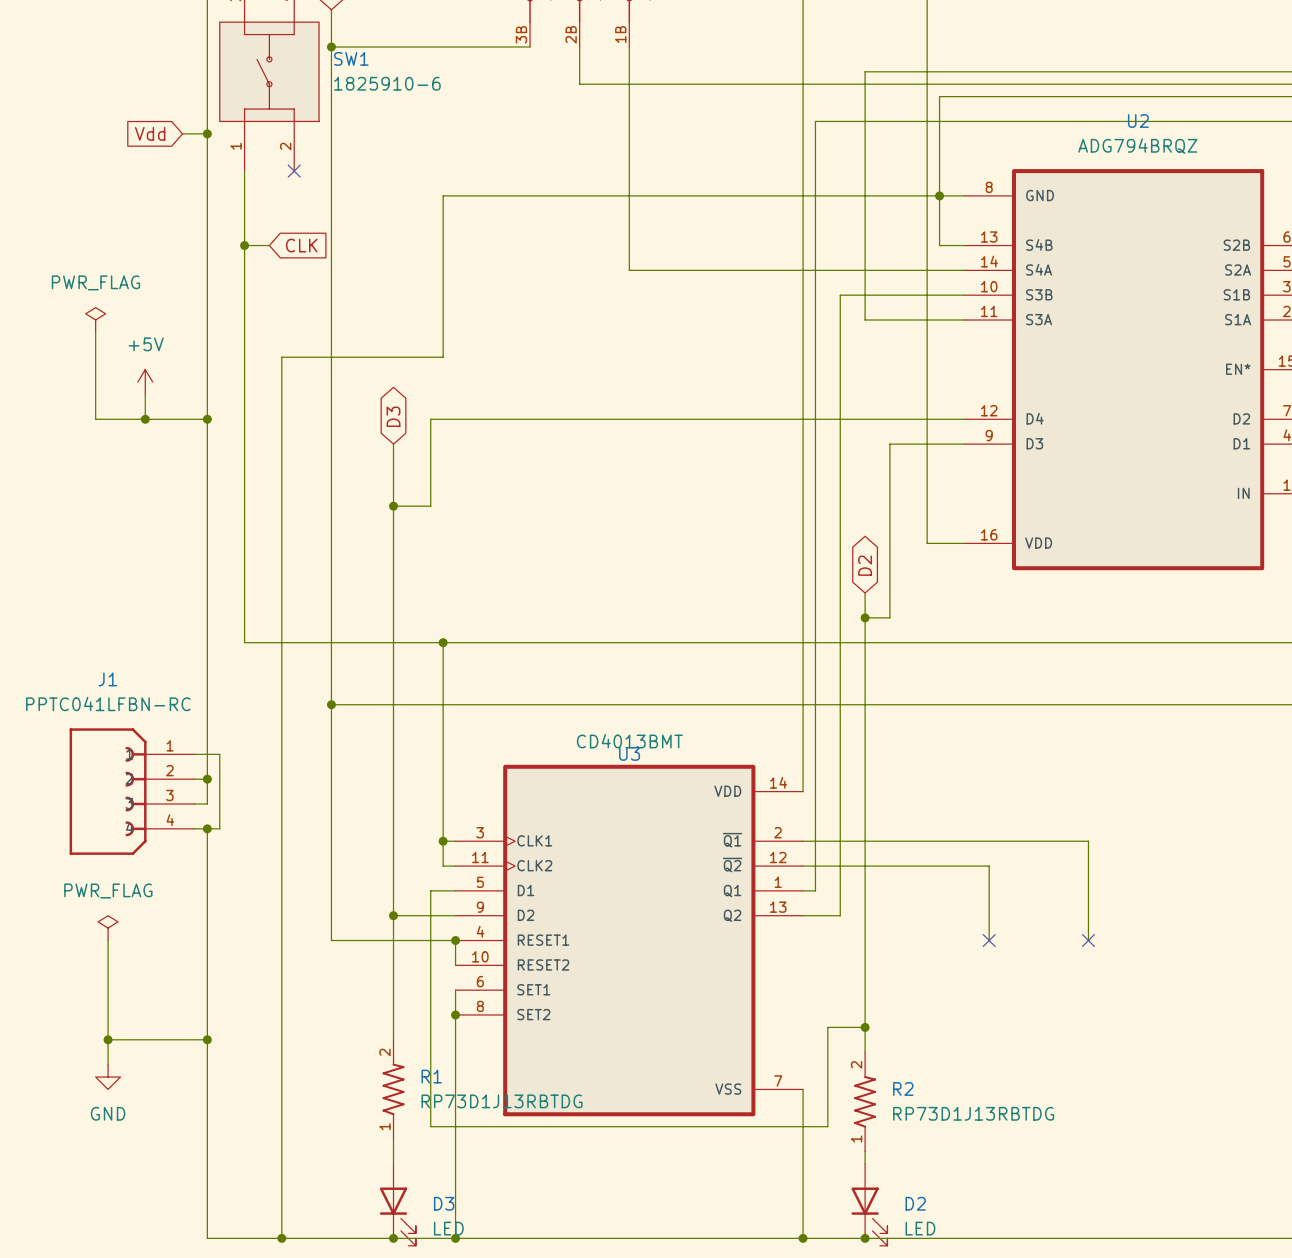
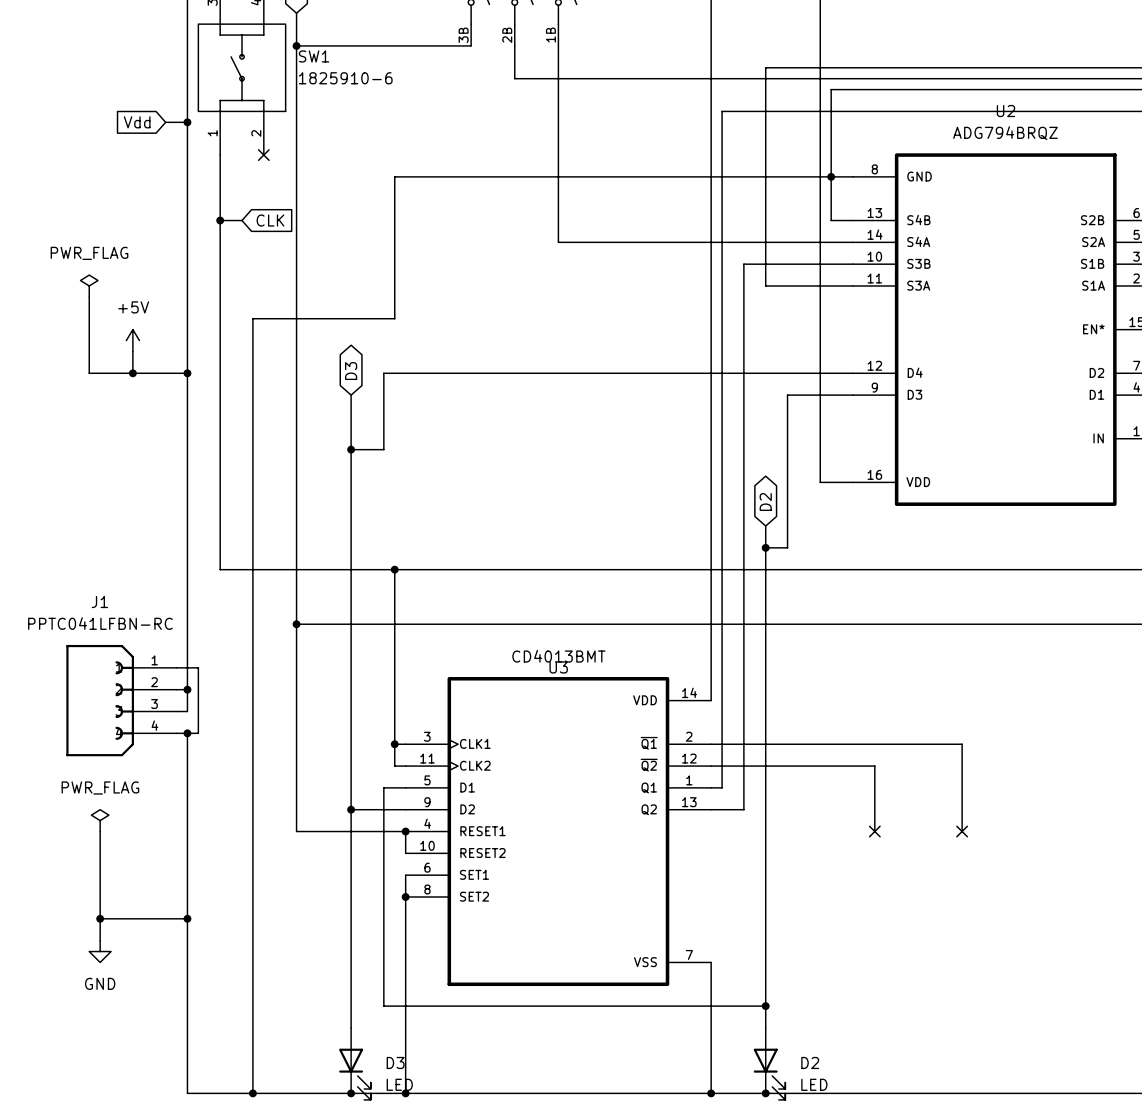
wire: (865, 1027) (827, 1027) (827, 1126) (430, 1126) -> (765, 1006) (383, 1006) (383, 995)
junction: (865, 1027) -> none
R1: RP73D1J13RBTDG (393, 1089) -> none
R2: RP73D1J13RBTDG (865, 1101) -> none
junction: none -> (765, 1006)

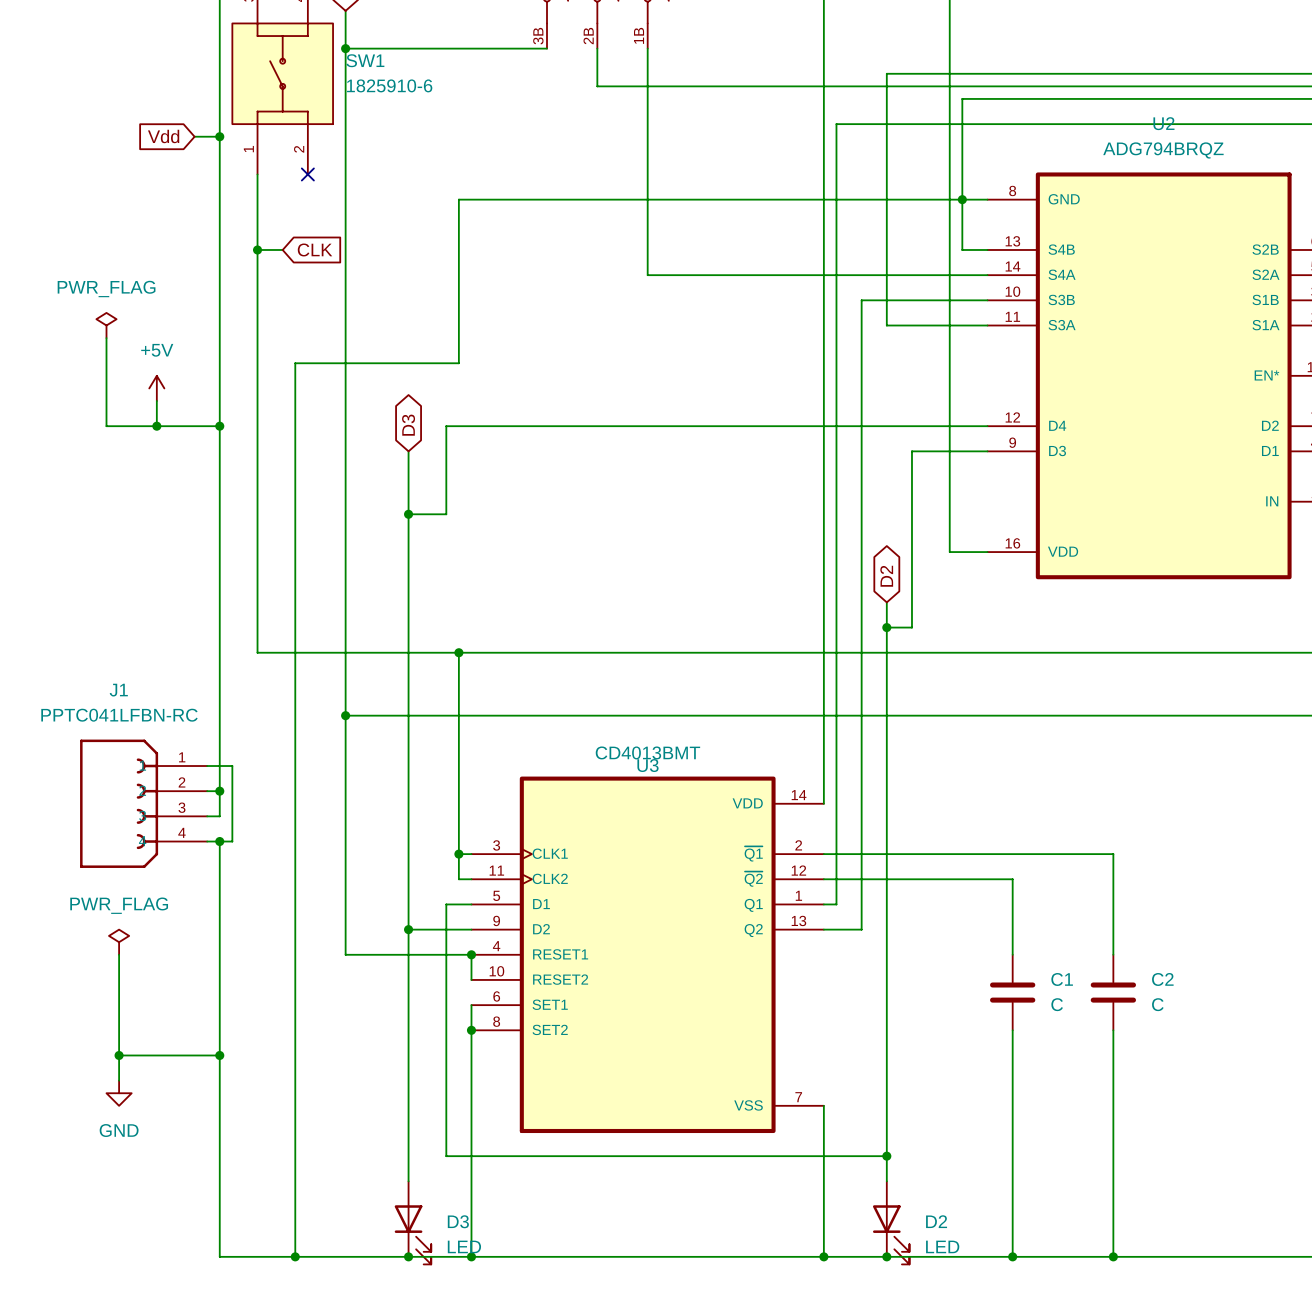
no-connect mark: (874, 831) -> none
no-connect mark: (962, 831) -> none
C1: none -> C (1012, 992)
C2: none -> C (1113, 992)
wire: none -> (1012, 1030) (1012, 1256)
wire: none -> (1113, 1030) (1113, 1256)
junction: none -> (1012, 1256)
junction: none -> (1113, 1256)

